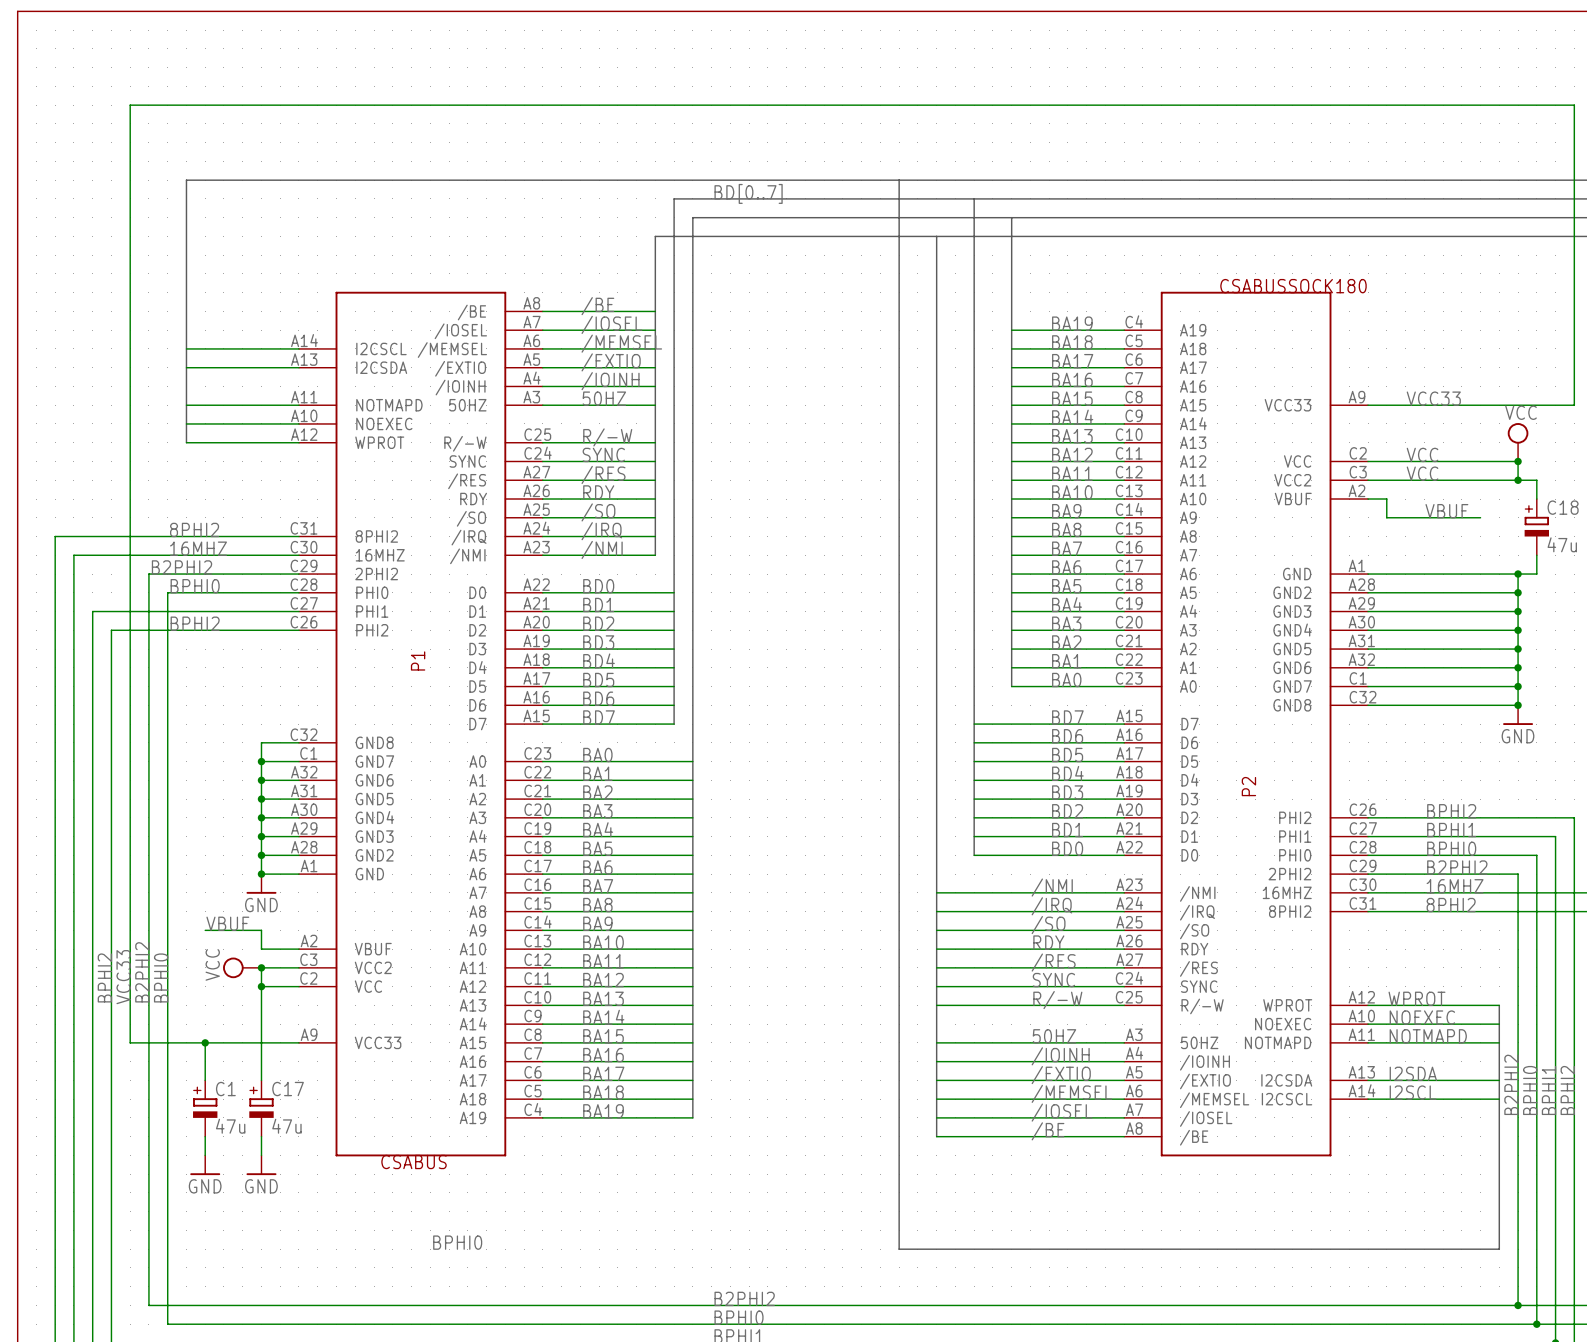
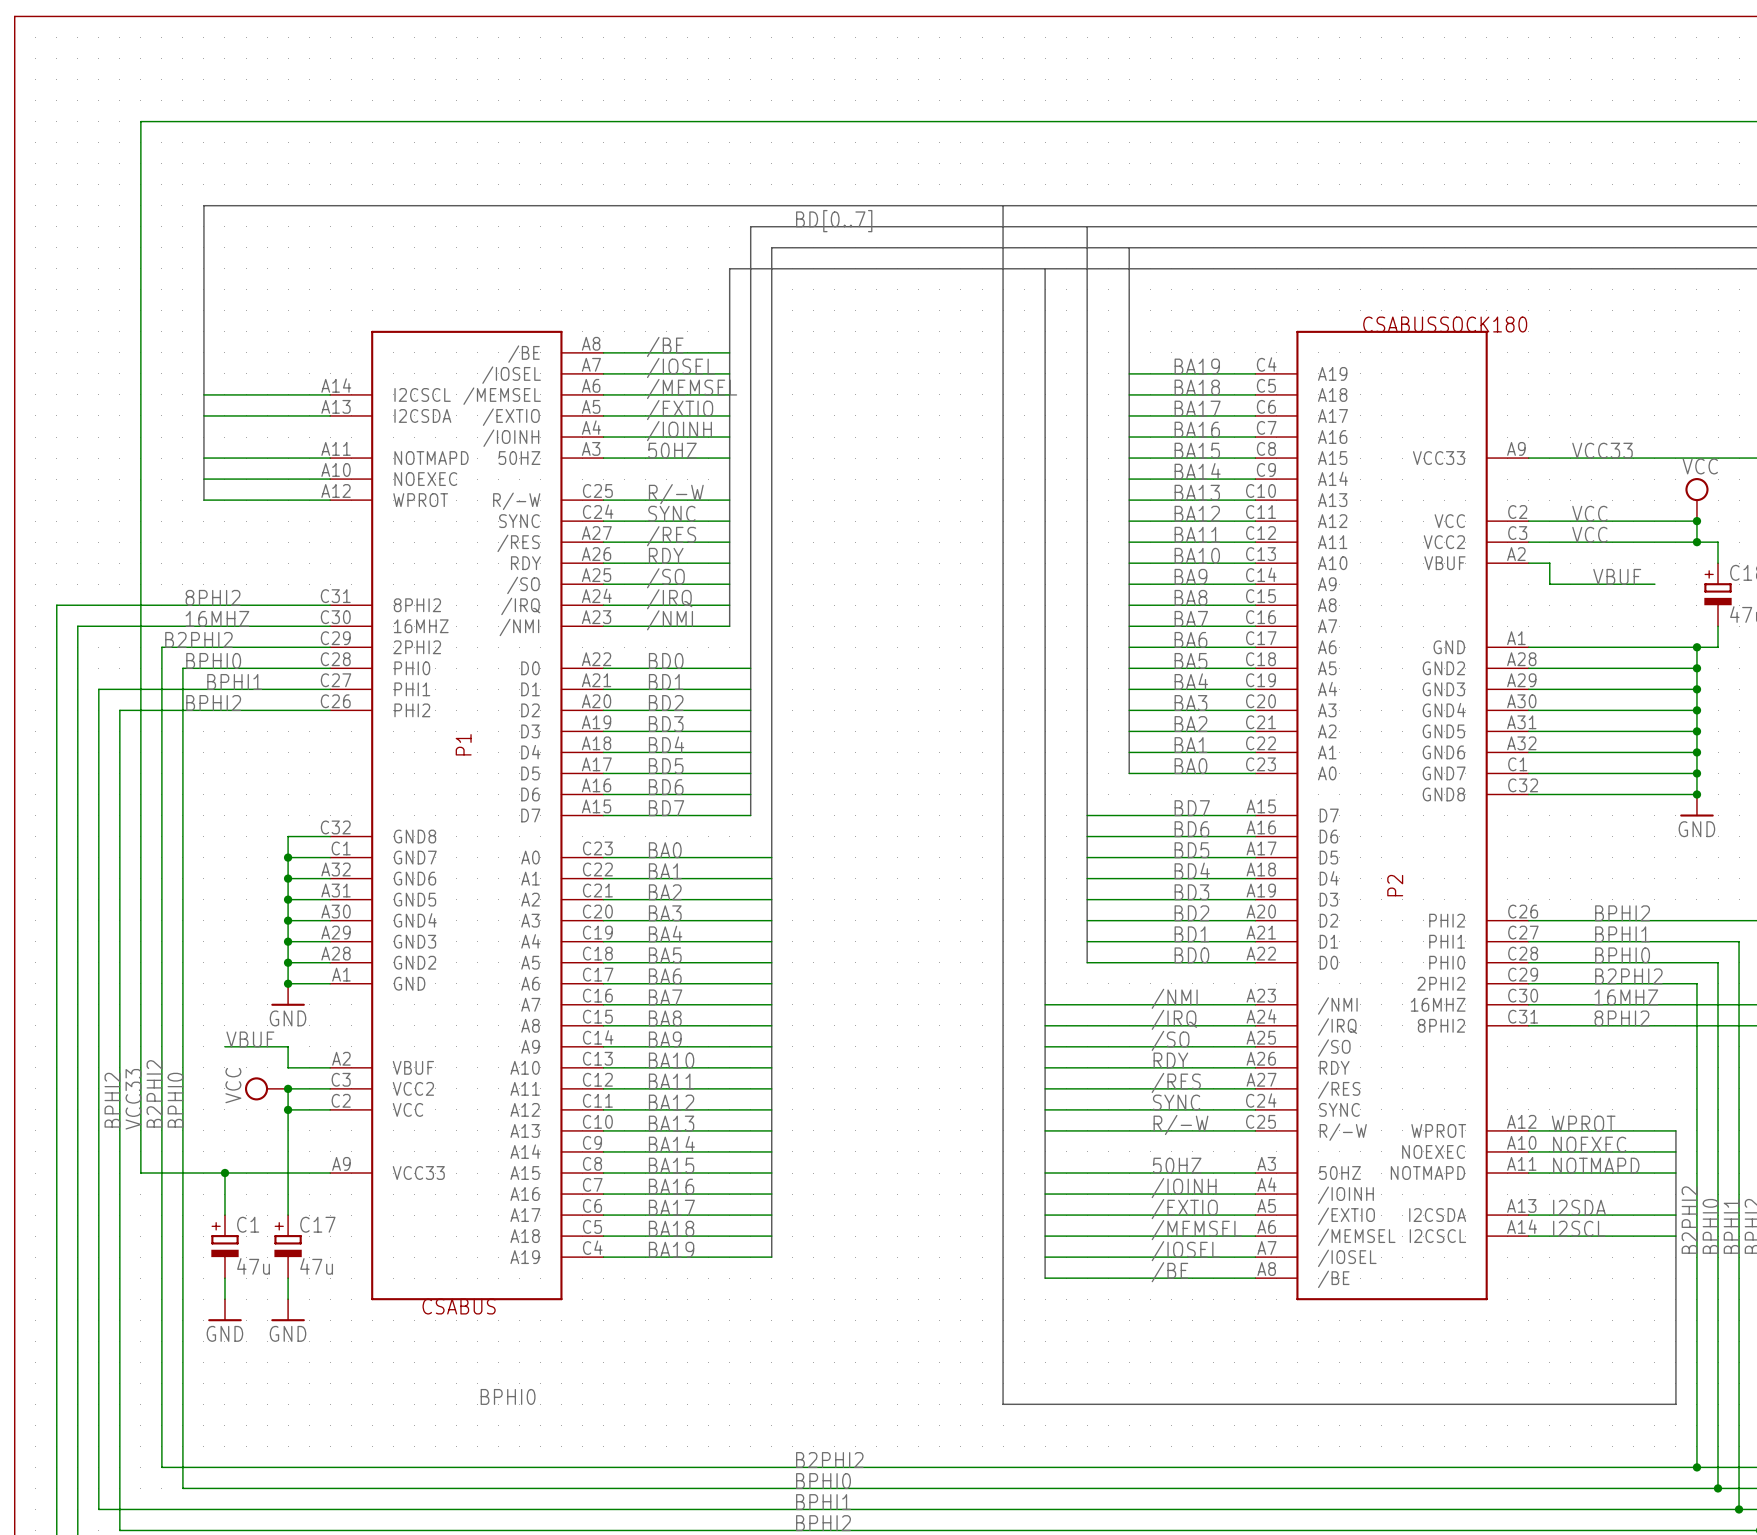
label: none -> BPHI1 (234, 681)

